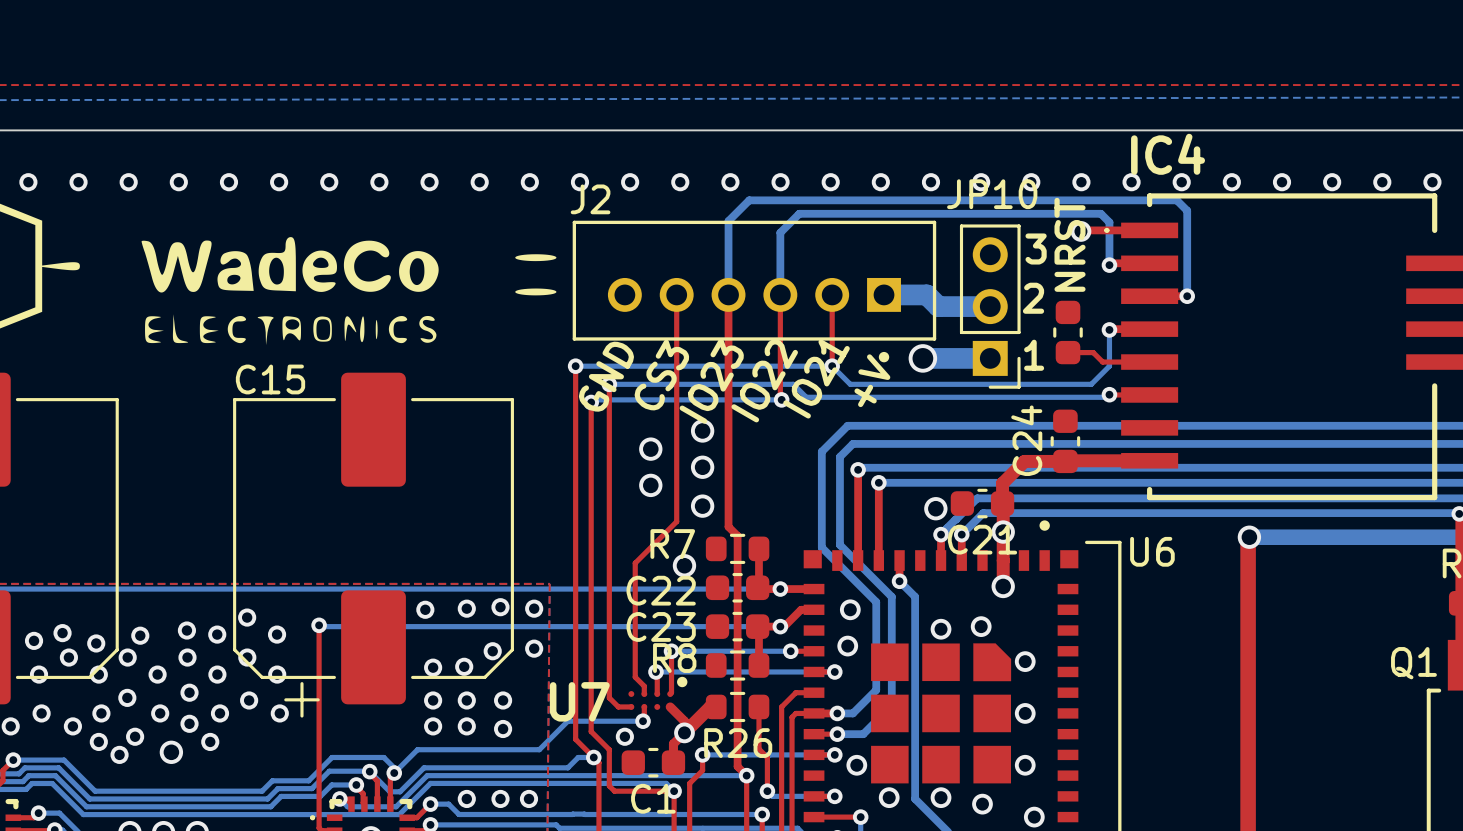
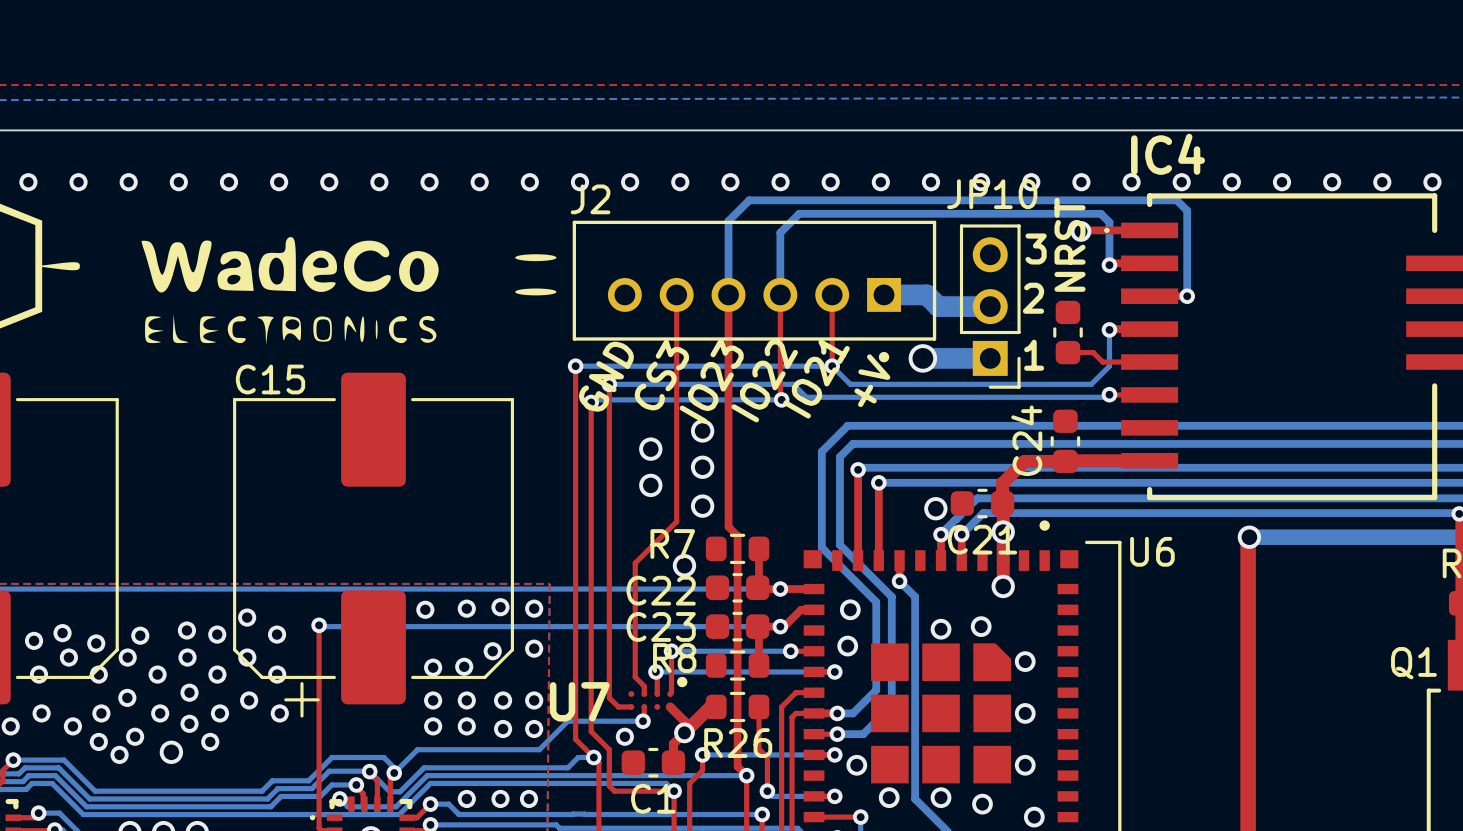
via: none -> (534, 700)
via: none -> (534, 728)

